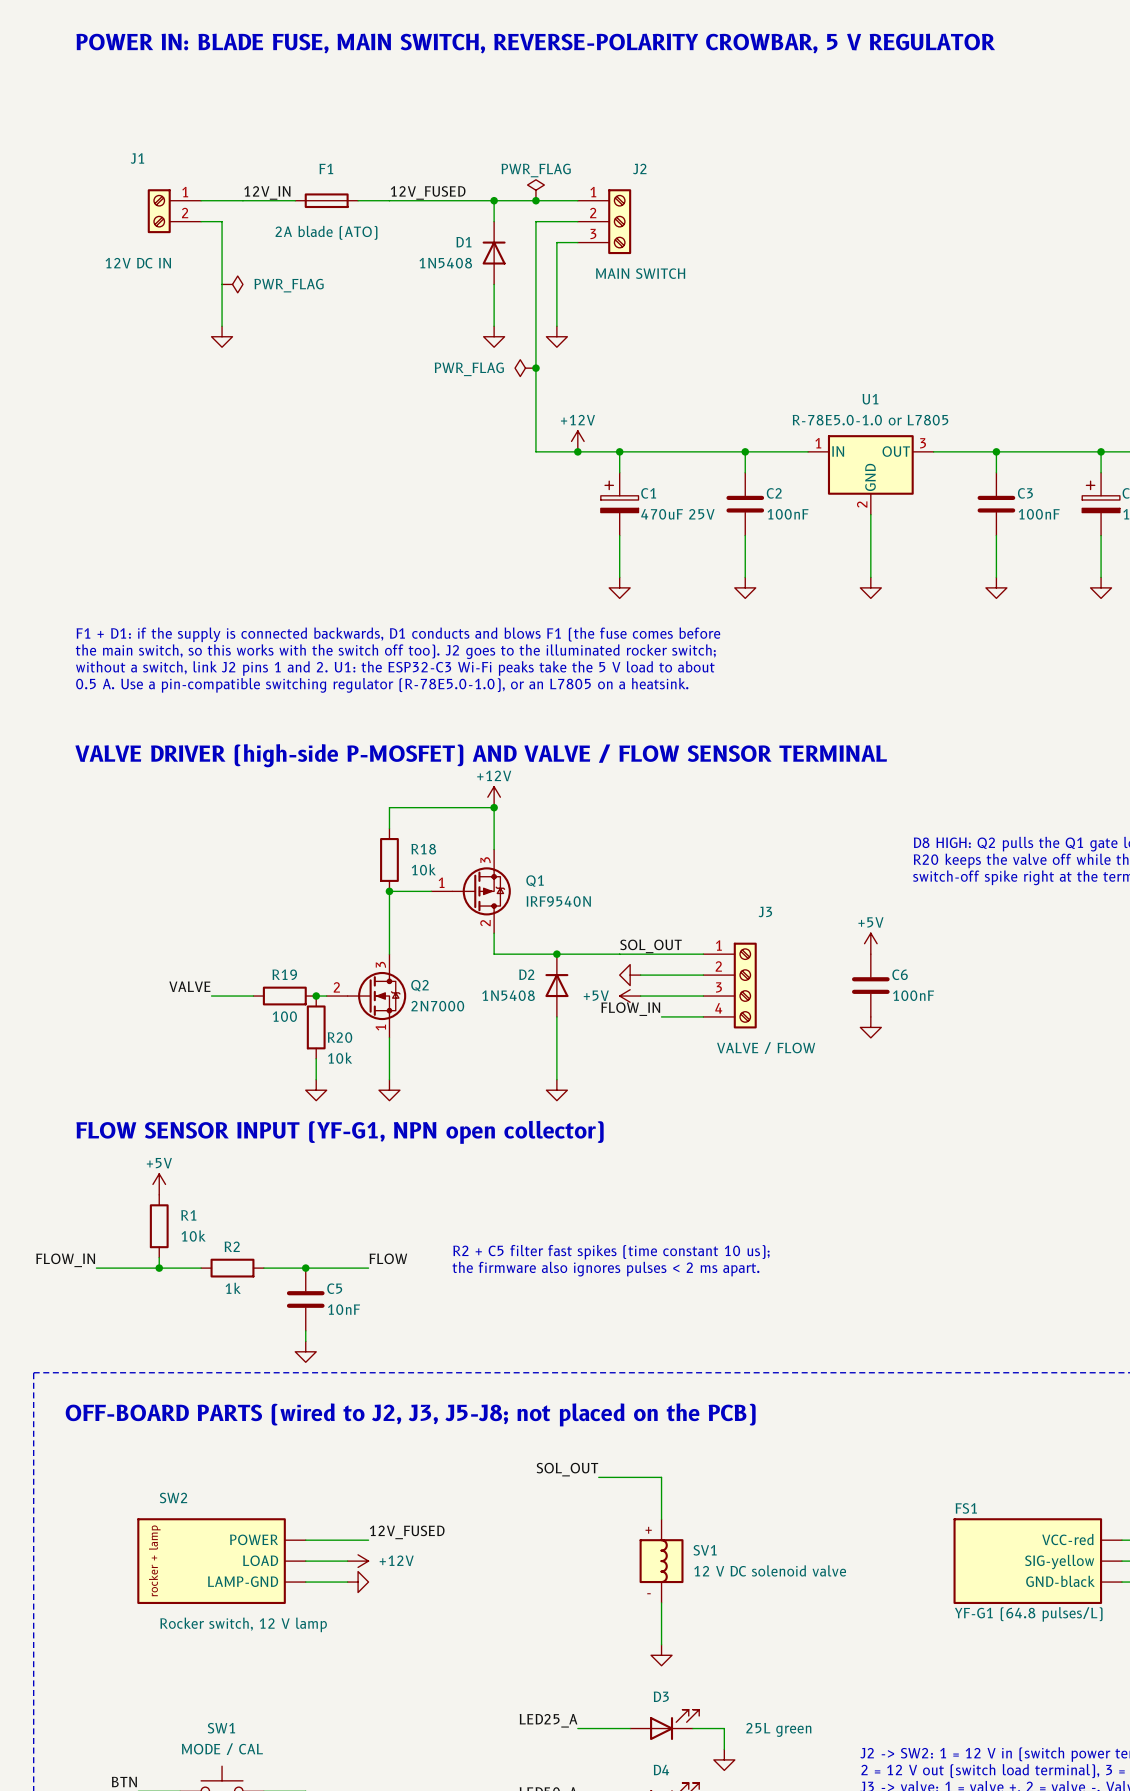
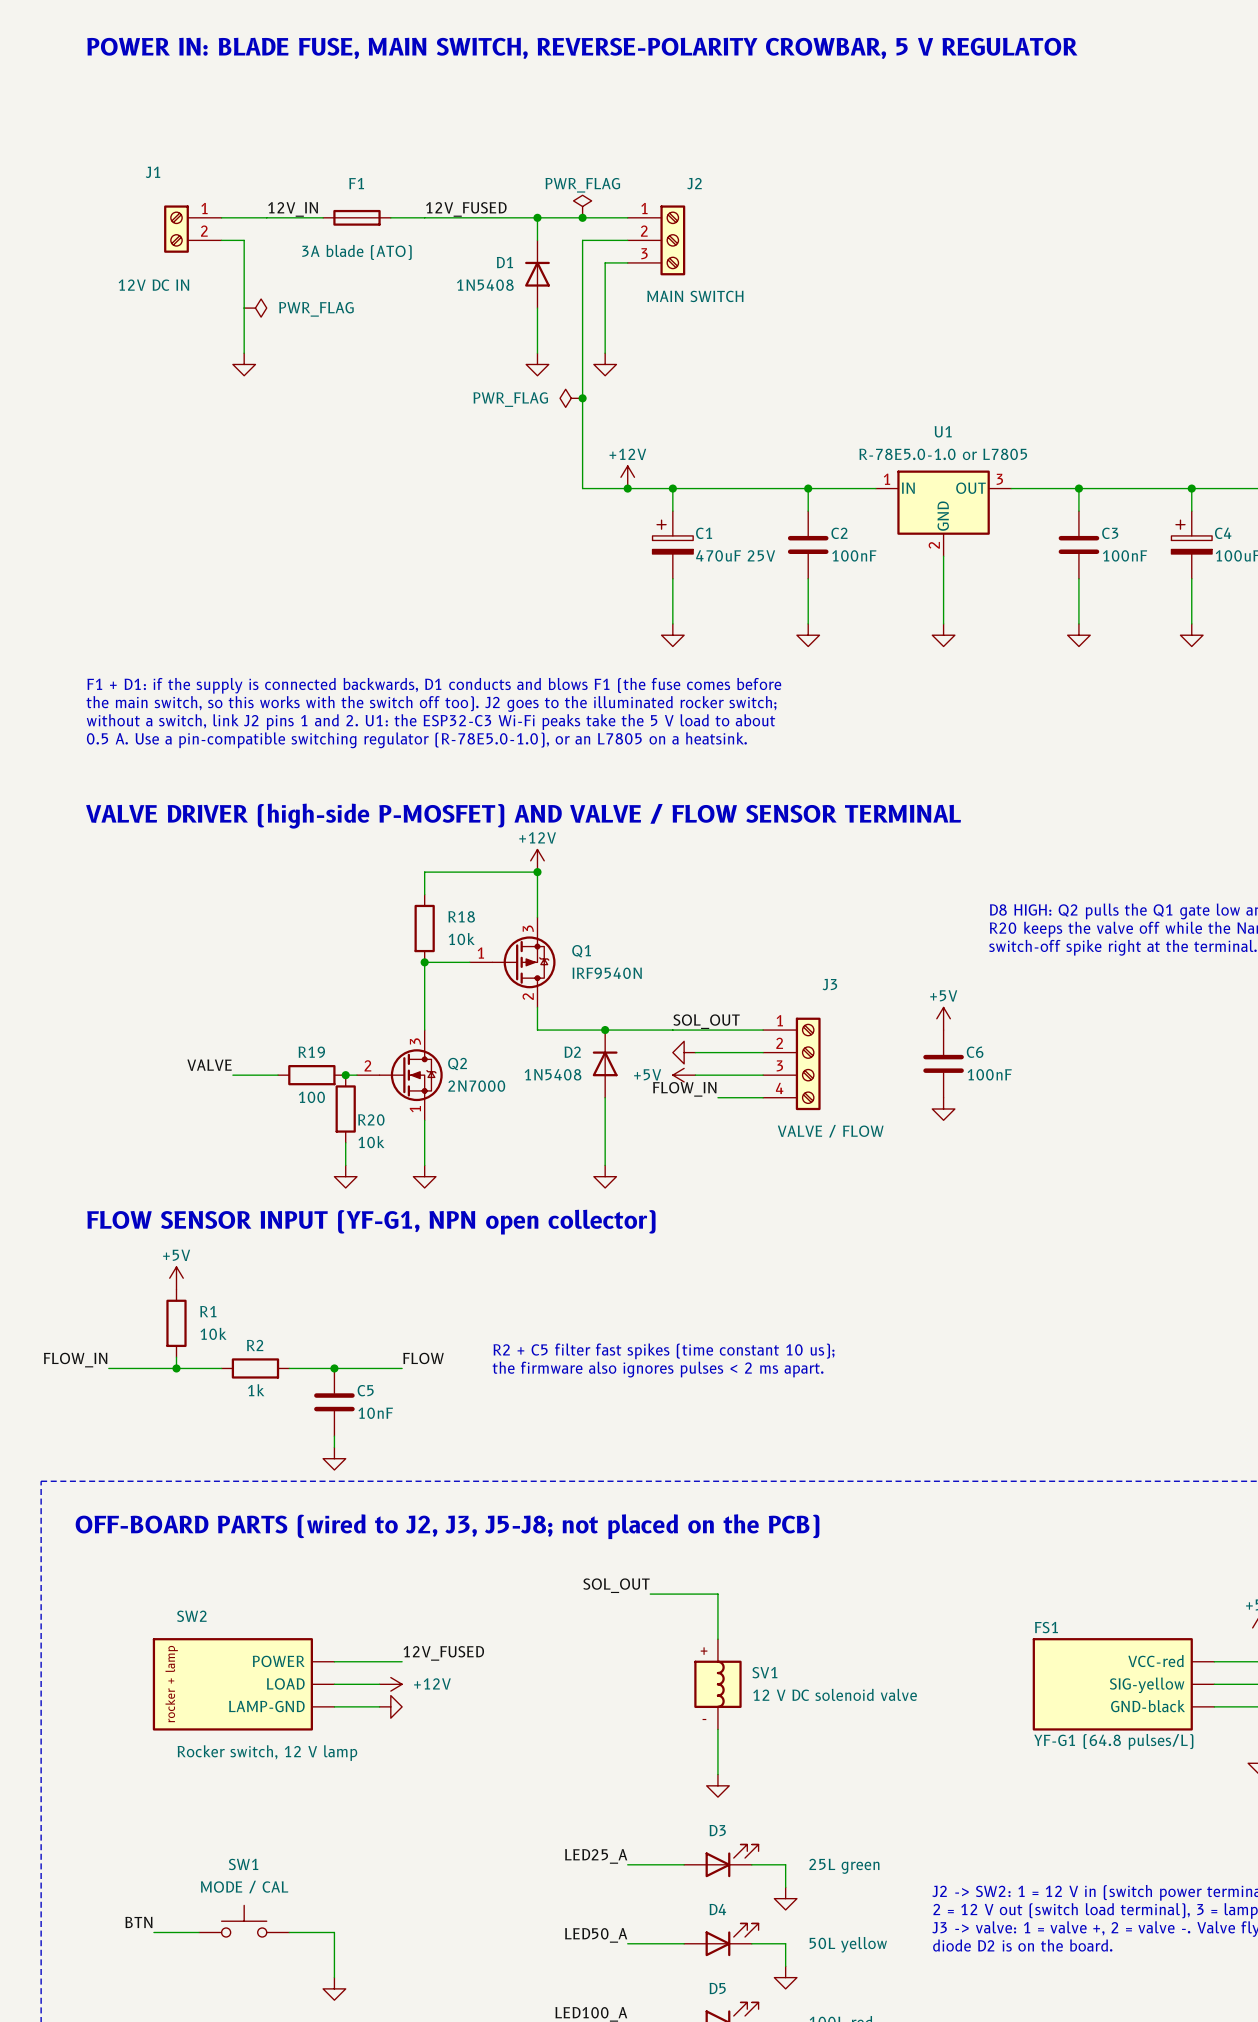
F1 value: 2A blade (ATO) (326, 232) -> 3A blade (ATO) (356, 252)

